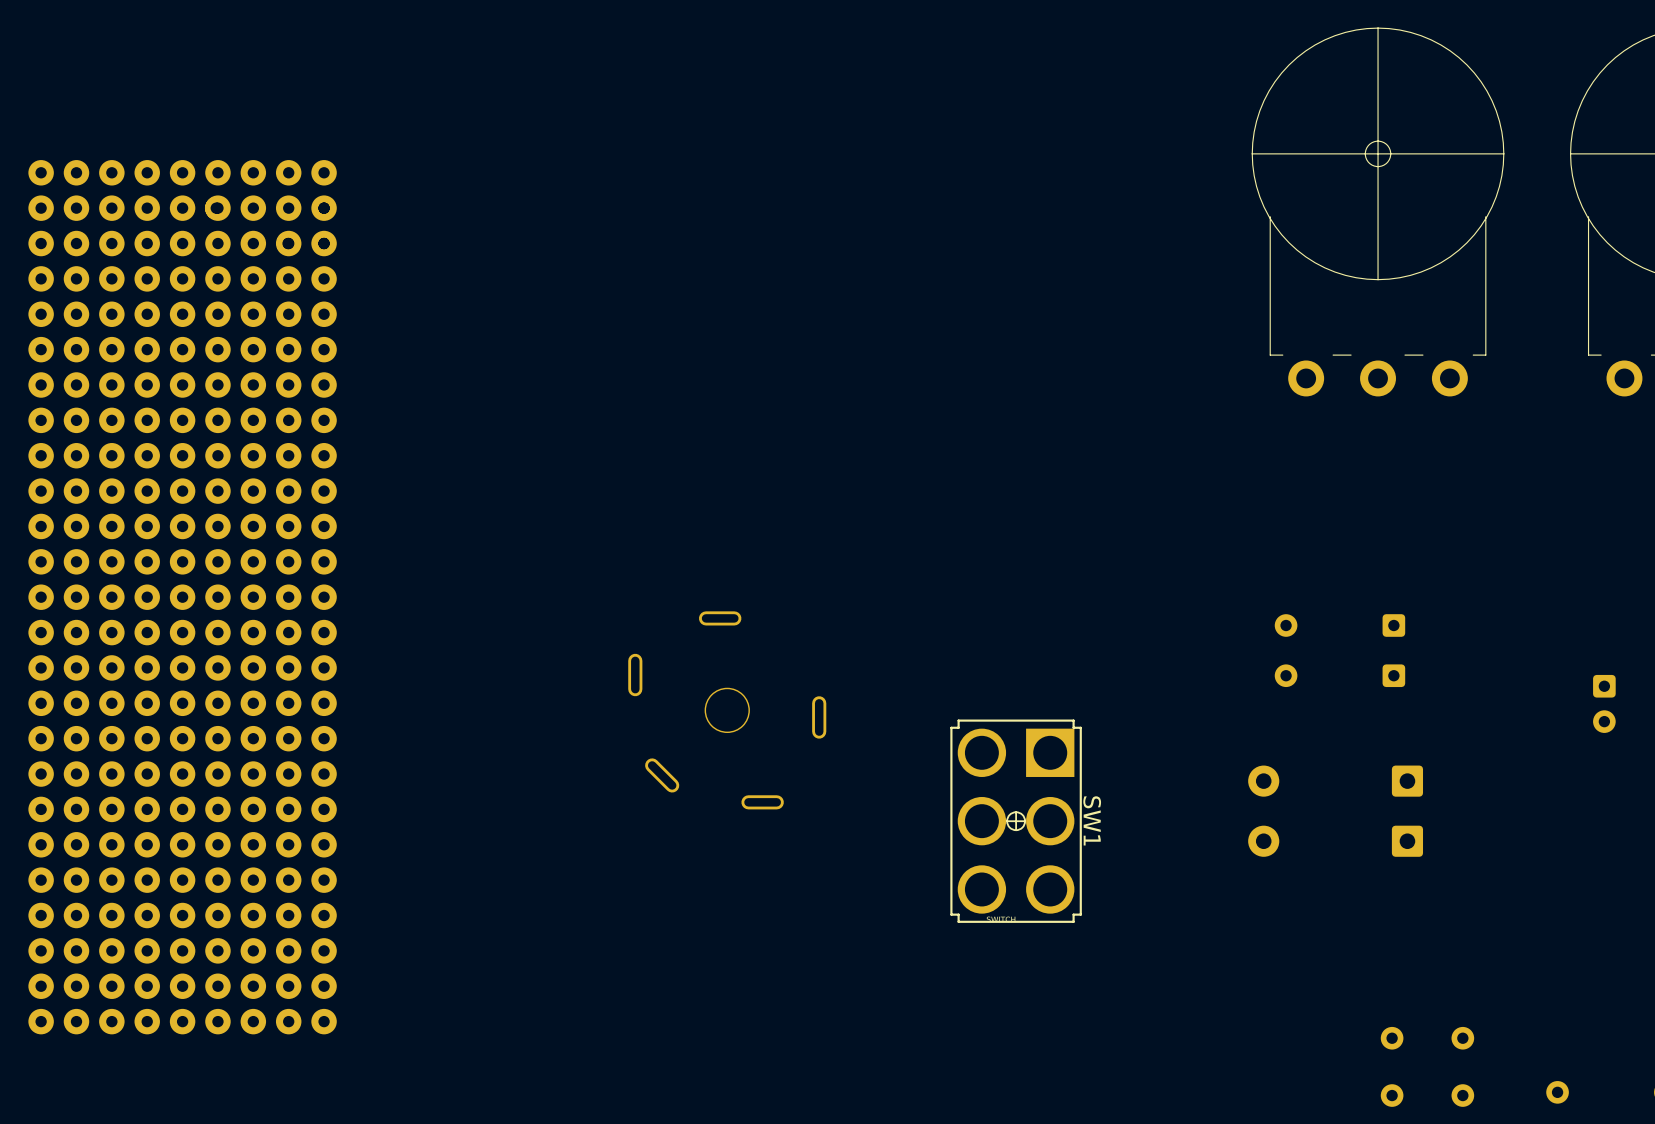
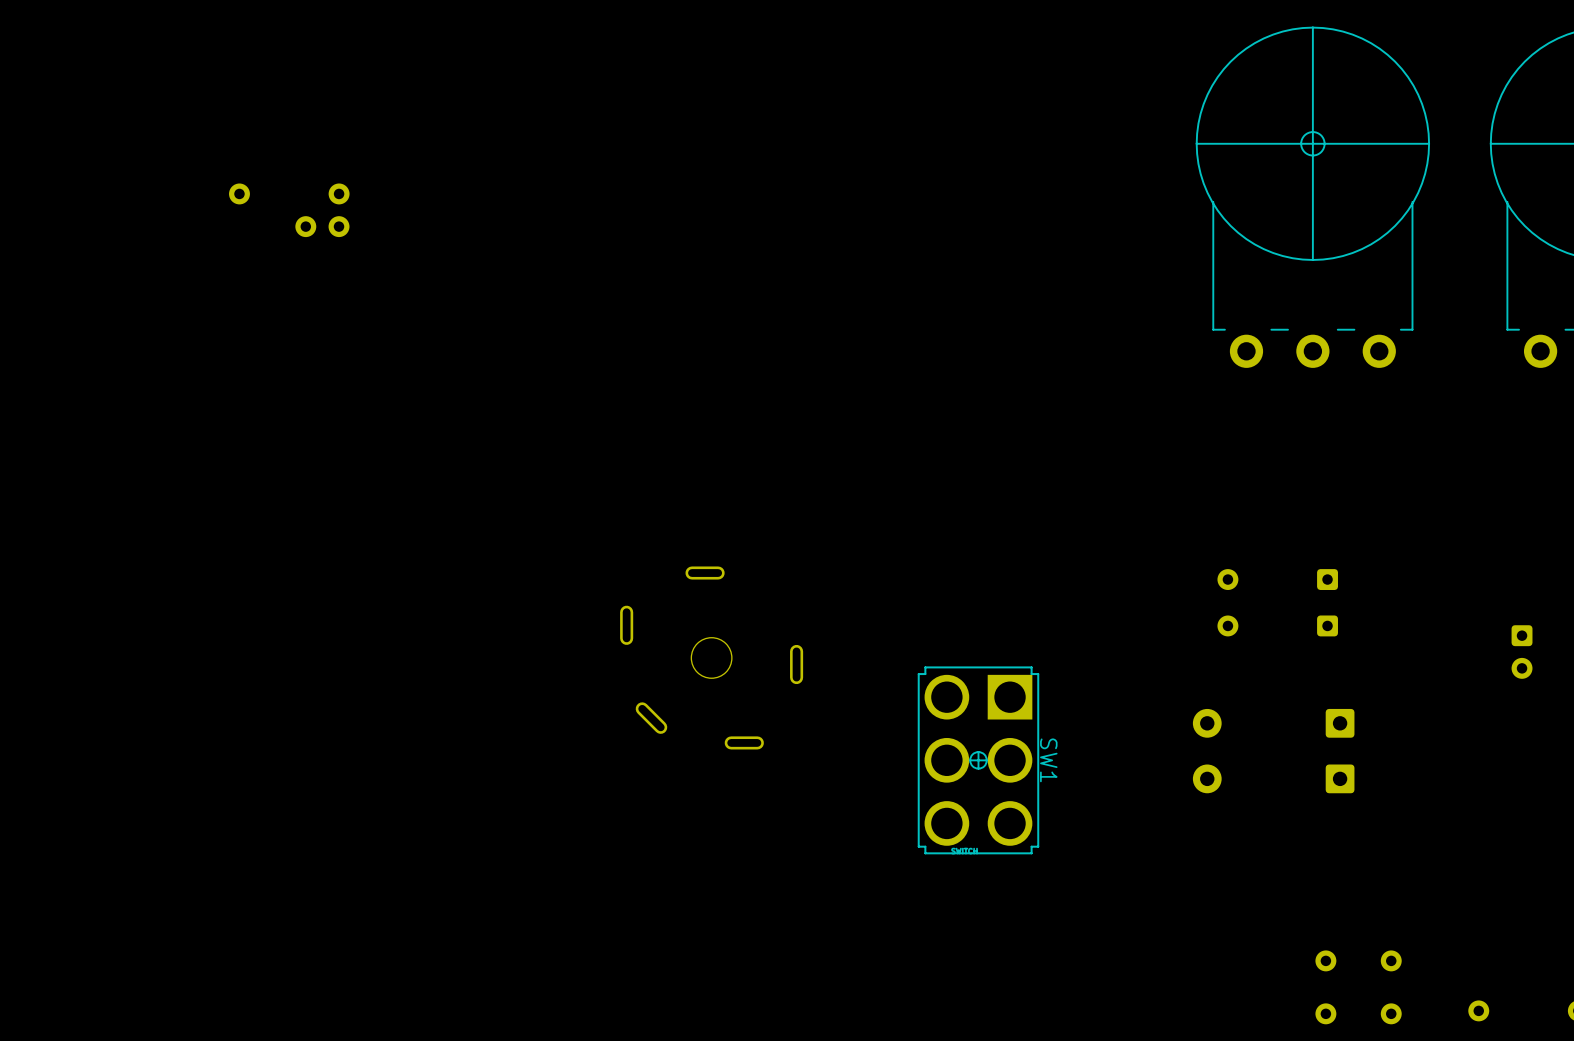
part: (182, 597) -> none

